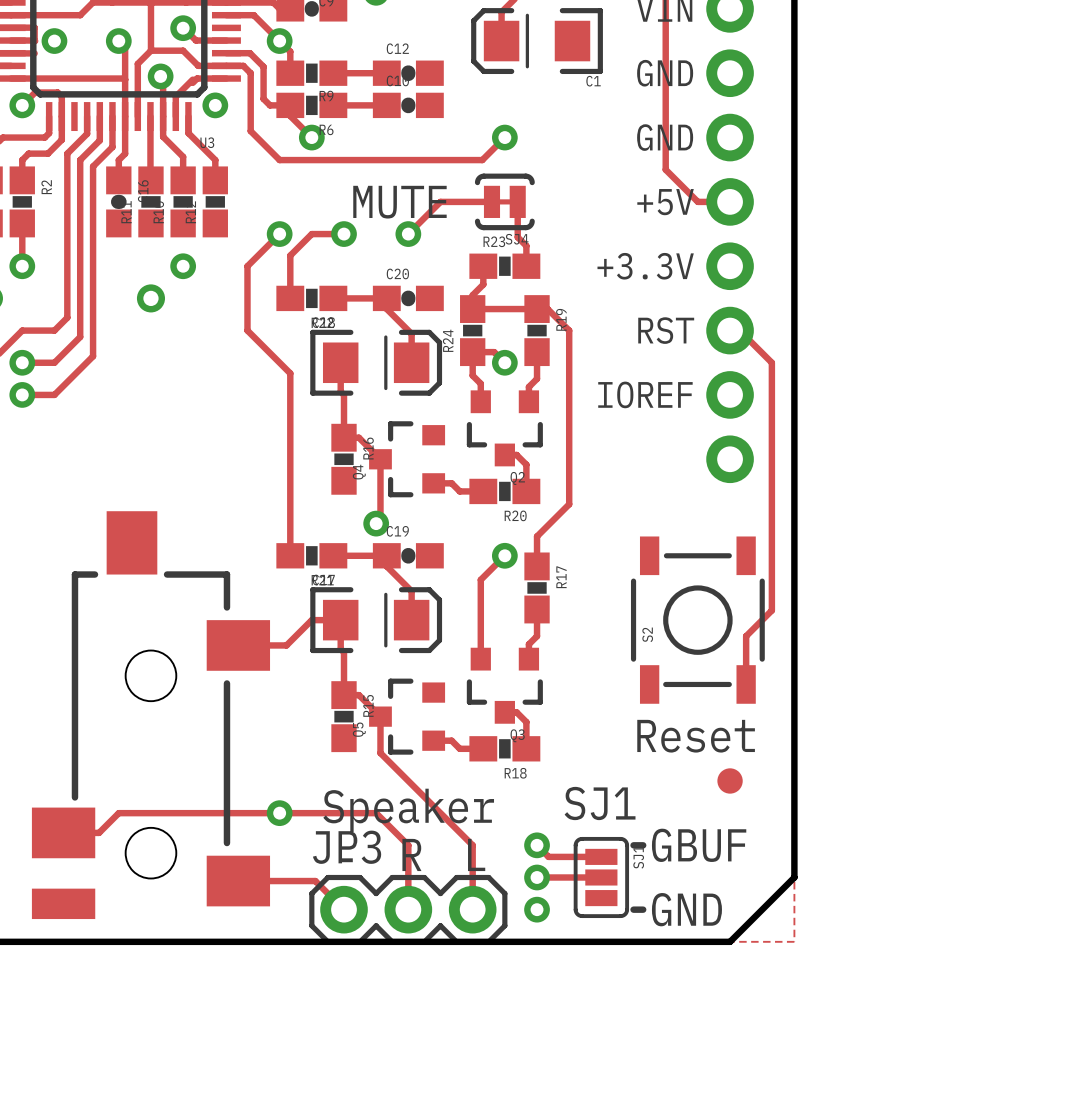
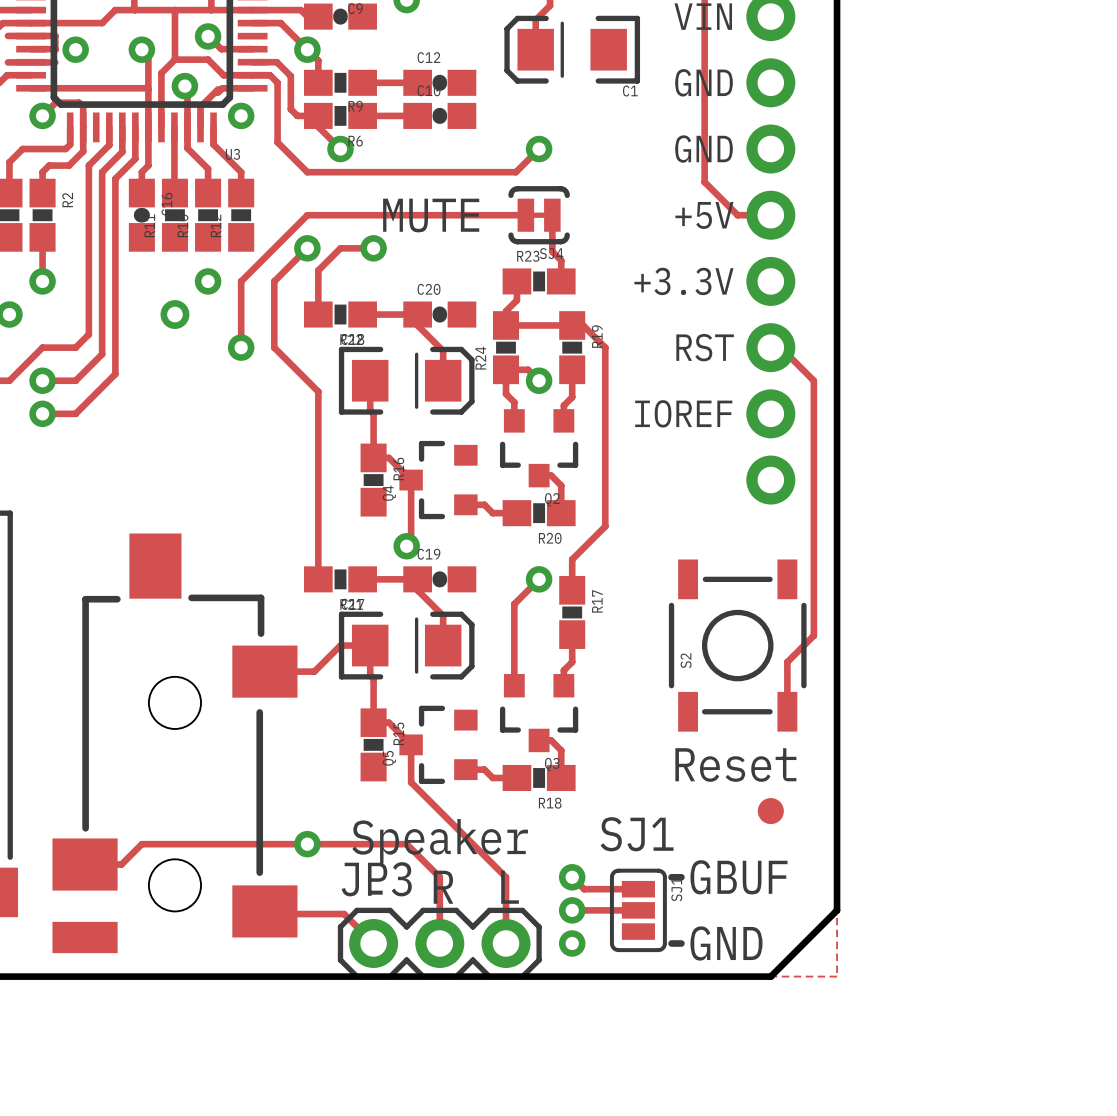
track: (440, 201) (408, 234) -> (472, 215) (307, 215) (241, 281) (241, 347)
via: (408, 234) -> none
via: none -> (241, 347)
part footprint: [31, 511, 271, 920] -> [52, 533, 298, 954]

